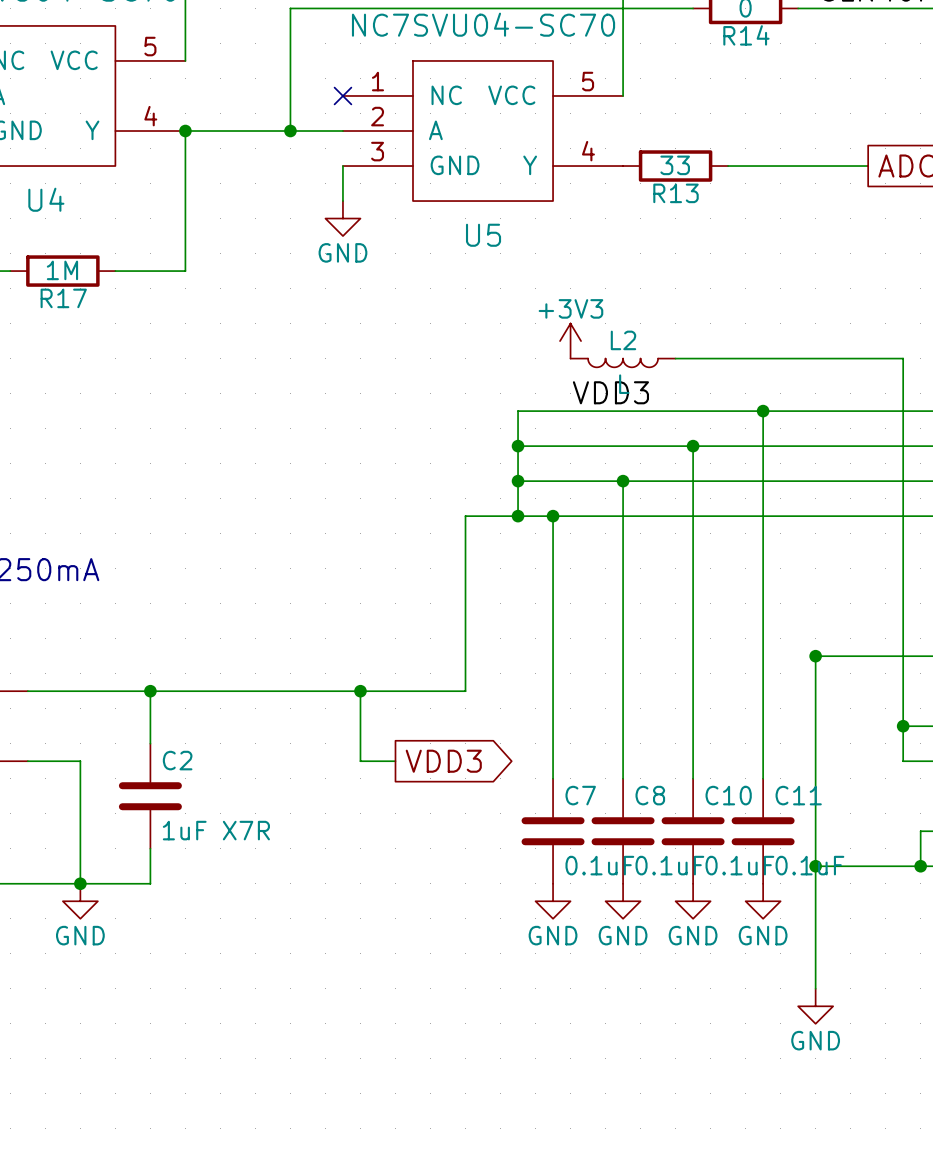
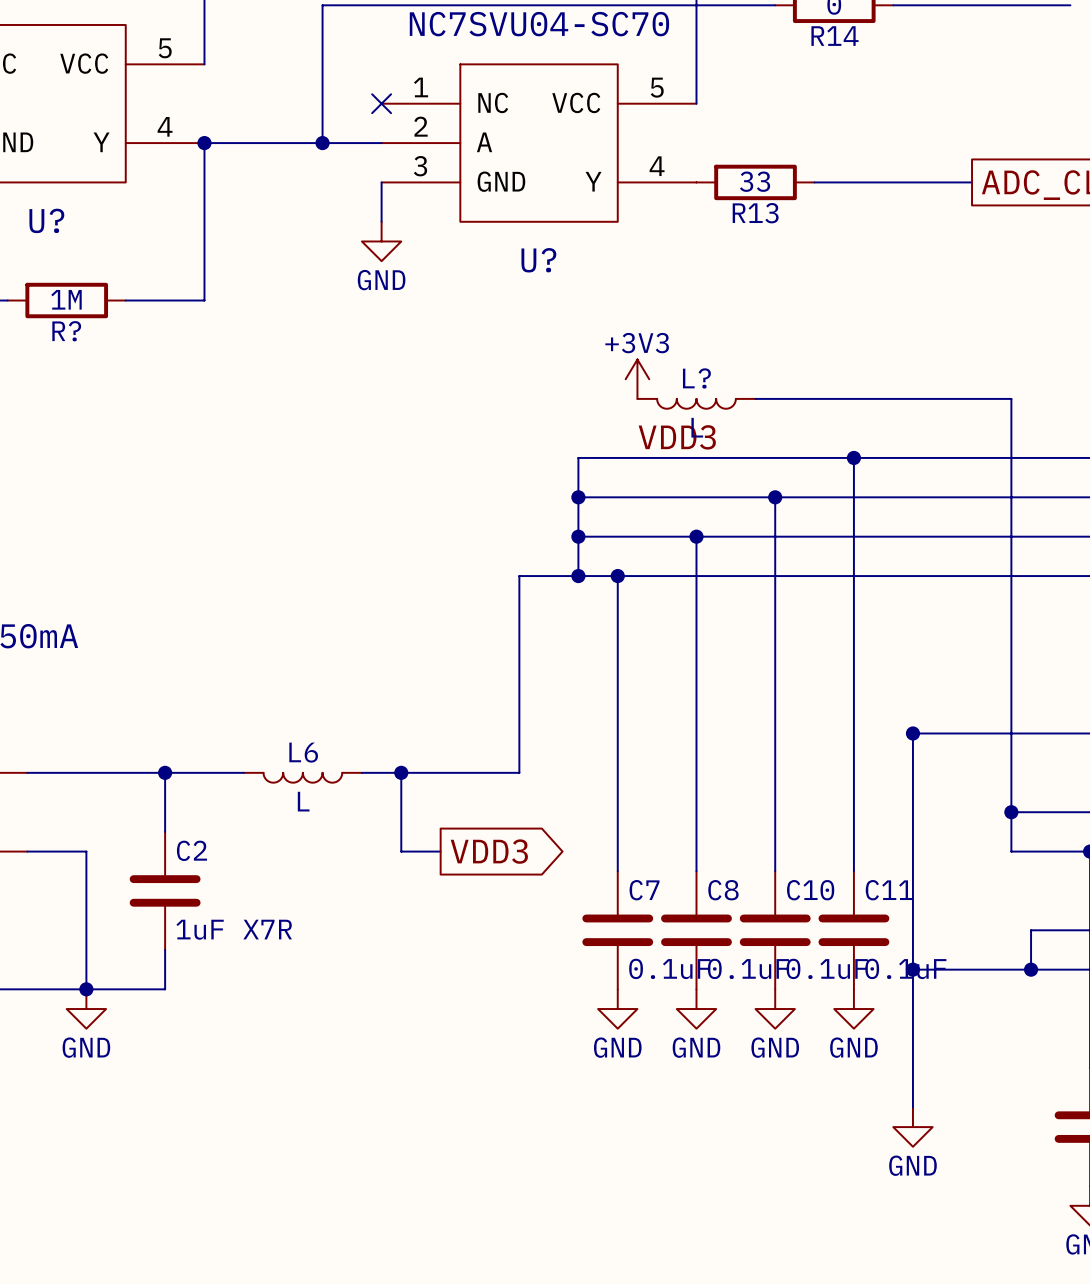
U4 name: U4 (46, 199) -> U? (46, 220)
U5 name: U5 (483, 235) -> U? (538, 260)
R17 name: R17 (63, 298) -> R? (66, 331)
L2 name: L2 (623, 340) -> L? (696, 378)
wire: (220, 691) (325, 691) -> none
L6: none -> L (302, 777)

